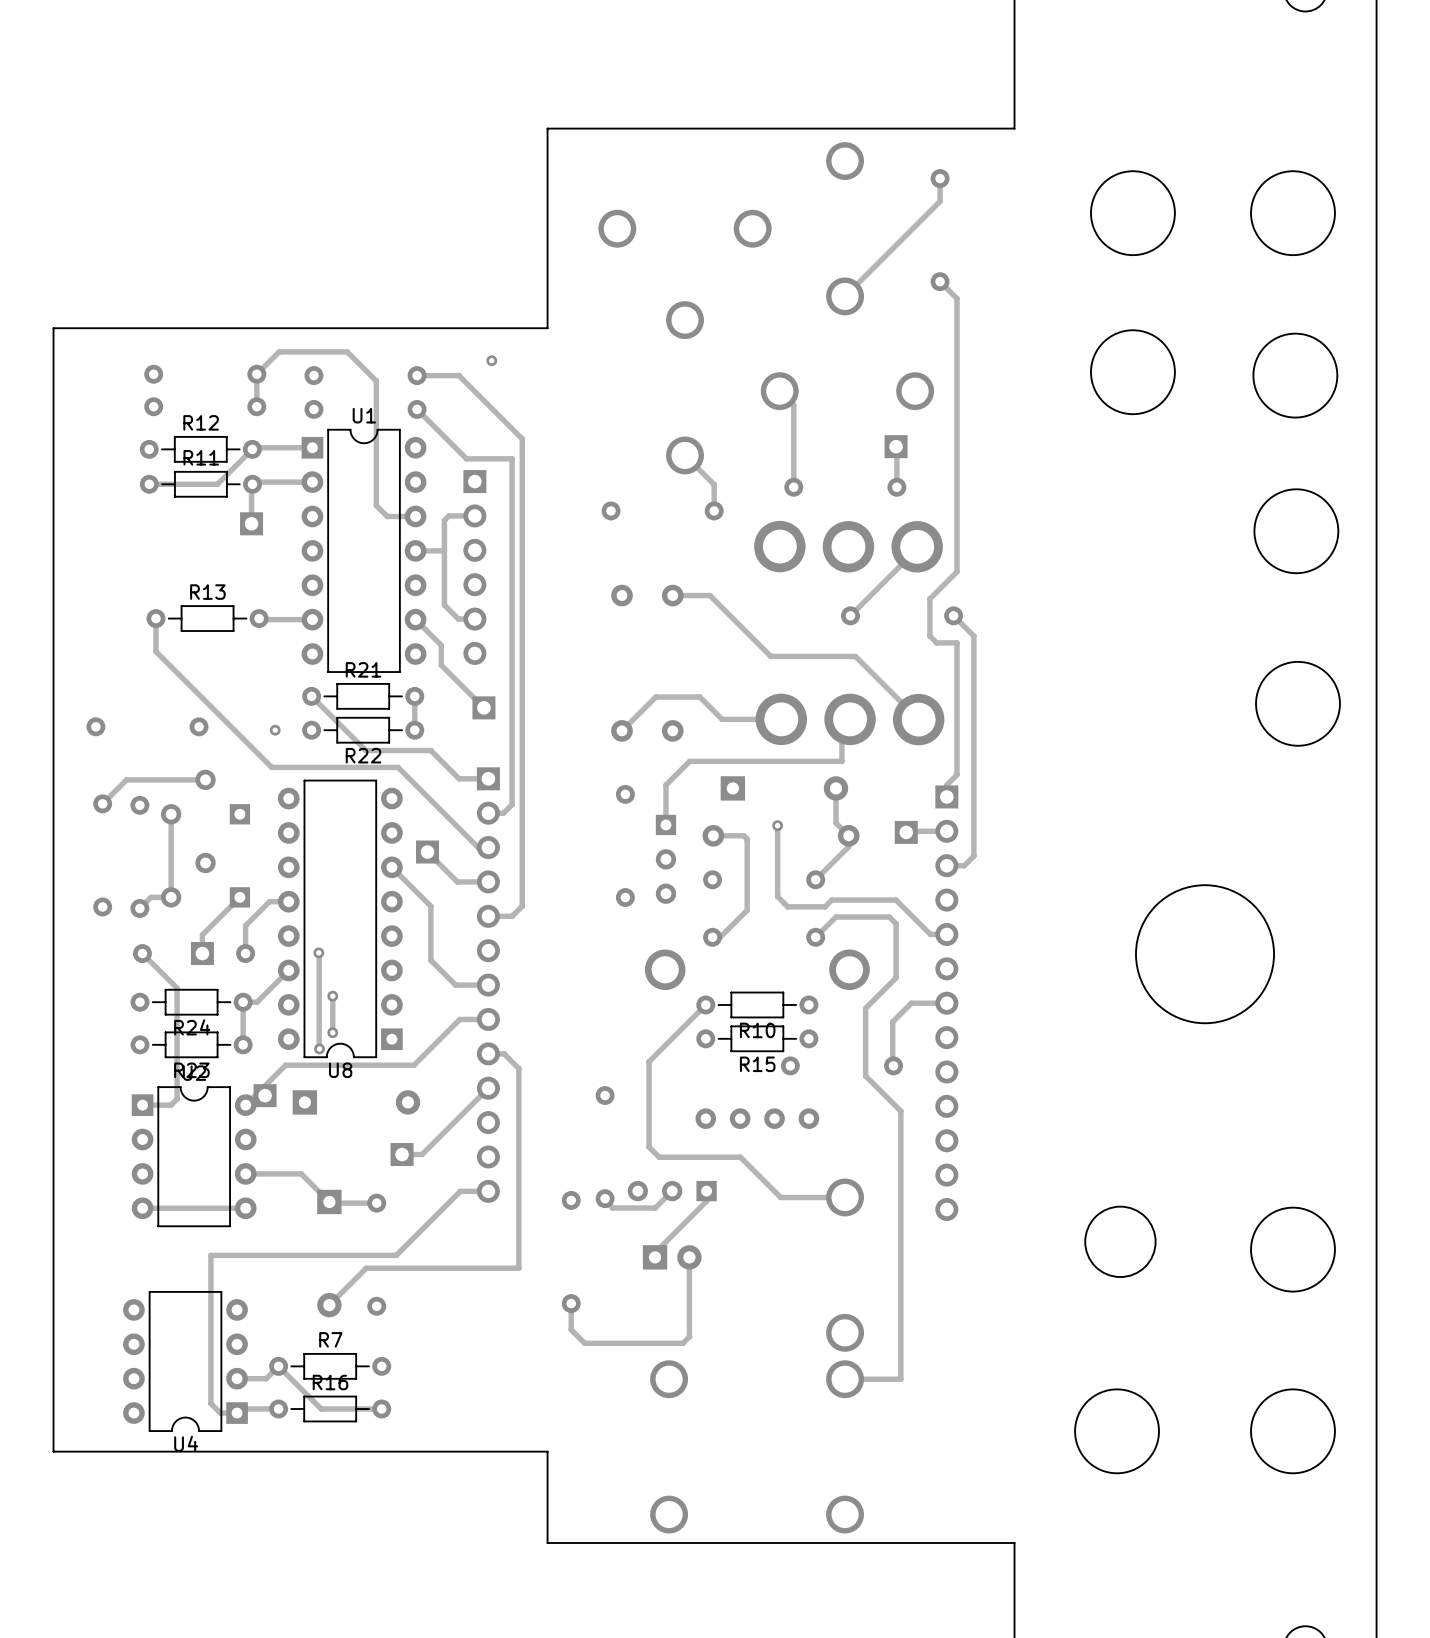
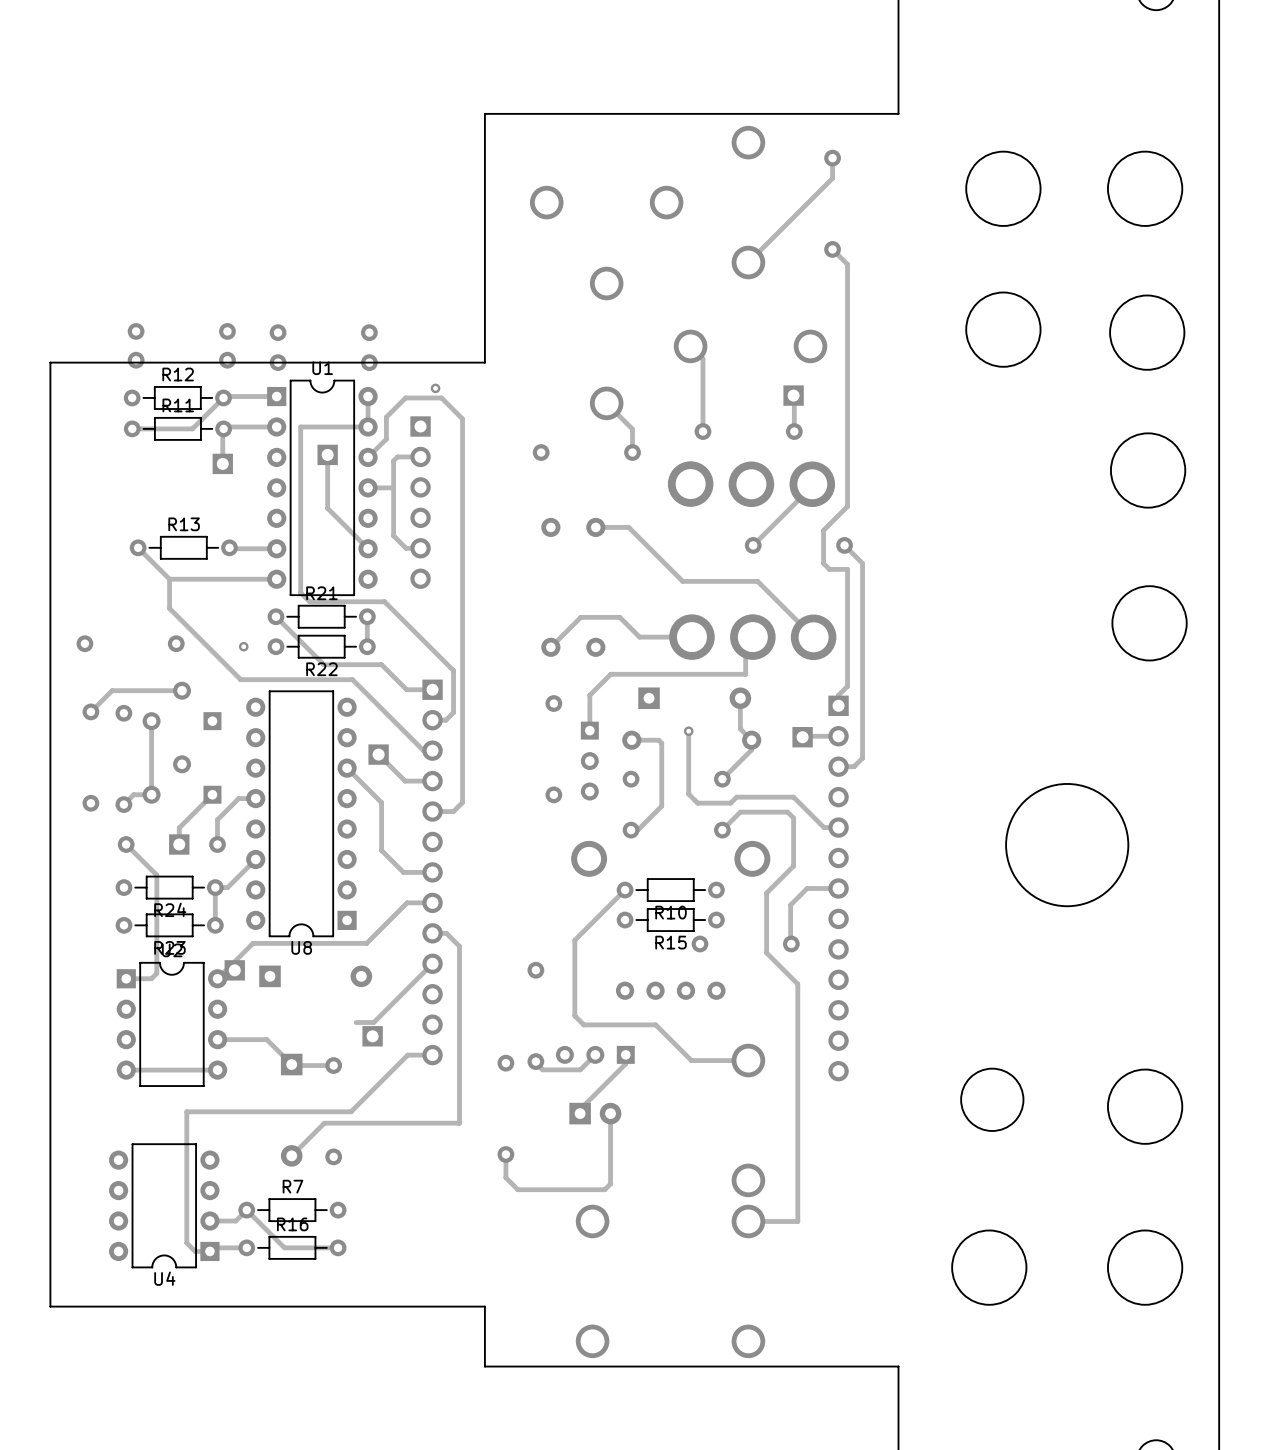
board edge: (547, 328) (53, 328) (53, 1451) (547, 1451) (547, 1475) -> (484, 290) (484, 362) (50, 362) (50, 1306) (484, 1306)
via position: (491, 360) -> (435, 388)
track: (417, 375) (458, 375) (522, 438) (522, 473) -> (368, 457) (386, 439) (386, 417) (405, 397) (441, 397) (462, 418)
track: (256, 406) (256, 374) (279, 351) (347, 351) (376, 381) (376, 505) (387, 516) (415, 516) -> none
track: (417, 409) (466, 458) (512, 458) (512, 757) -> (368, 396) (368, 426) (300, 426) (300, 592) (309, 601) (384, 601) (453, 670)
track: (155, 618) (155, 651) (191, 687) -> (138, 547) (169, 579)
track: (415, 619) (441, 645) (441, 665) (483, 707) -> (368, 548) (327, 508) (327, 454)
track: none -> (169, 579) (169, 608)
track: none -> (276, 579) (169, 579)
part position: (483, 707) -> (327, 454)
via: (318, 952) -> none
track: (319, 953) (319, 1048) -> none
track: (332, 996) (332, 1032) -> none
via: (332, 996) -> none
via: (332, 1032) -> none
via: (319, 1048) -> none
part position: (402, 1154) -> (372, 1036)

